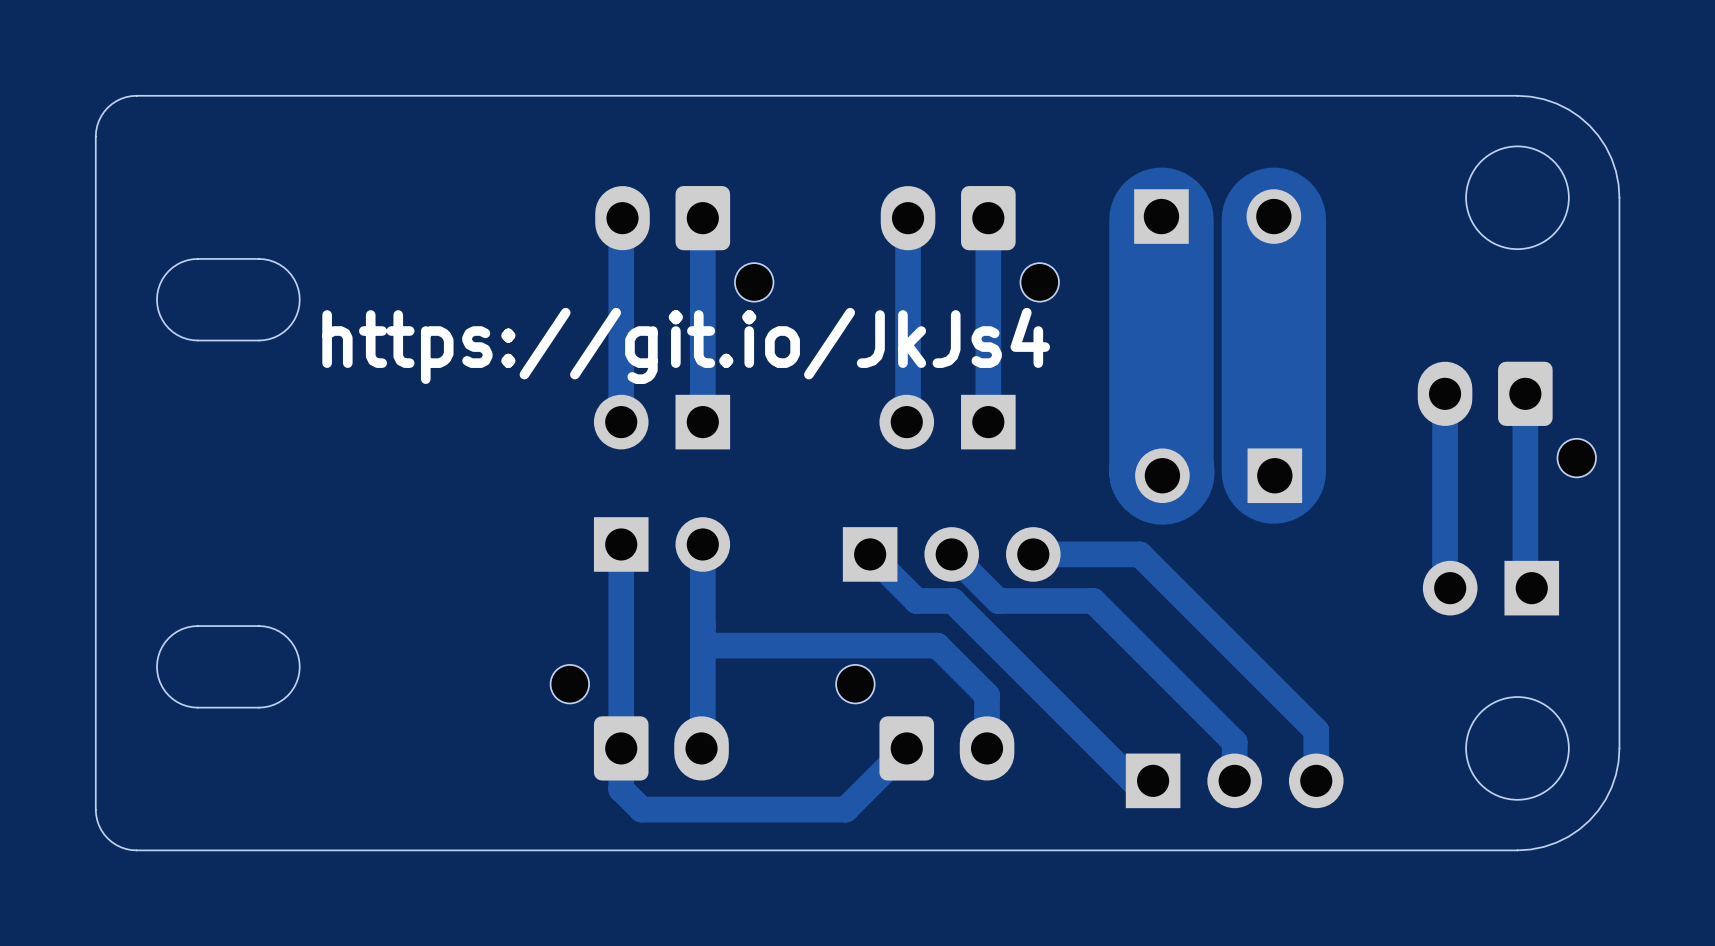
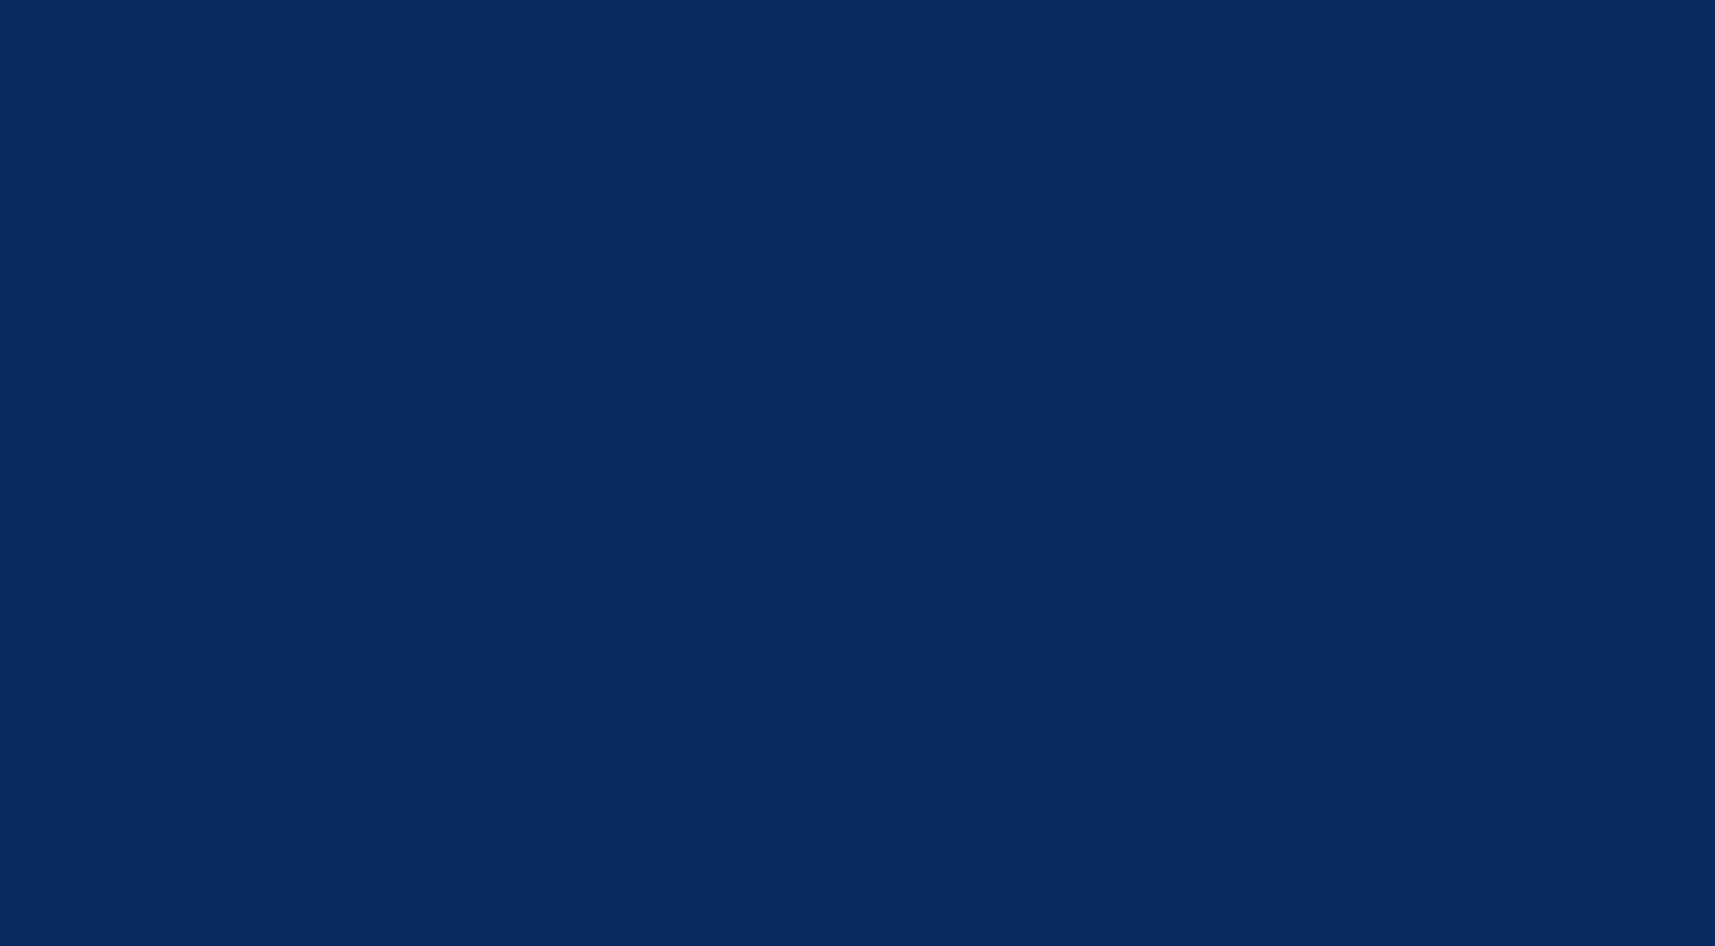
board edge: (1517, 95) (136, 95) (116, 101) (101, 116) (95, 136) (95, 809) (101, 830) (116, 844) (136, 850) (1517, 850) (1543, 846) (1568, 836) (1589, 820) (1598, 810) (1611, 787) (1618, 761) (1618, 184) (1615, 171) (1605, 146) (1598, 135) (1579, 116) (1556, 103) (1543, 99) (1517, 95) -> none
round board edge: [1465, 145, 1570, 250] -> none
part: (1217, 216) -> none
track: (622, 218) (621, 422) -> none
track: (702, 218) (702, 422) -> none
track: (908, 218) (906, 422) -> none
track: (988, 218) (988, 422) -> none
track: (1161, 219) (1162, 472) -> none
track: (1273, 219) (1274, 472) -> none
part: (684, 243) -> none
part: (969, 243) -> none
board edge: (258, 258) (192, 259) (177, 264) (165, 274) (158, 289) (157, 305) (162, 320) (172, 332) (192, 340) (258, 340) (279, 335) (287, 328) (296, 315) (299, 305) (298, 289) (291, 274) (283, 267) (274, 262) (258, 258) -> none
text: https://git.io/JkJs4 (686, 345) -> none
track: (1445, 393) (1445, 583) (1450, 588) -> none
track: (1525, 393) (1525, 581) (1531, 588) -> none
part: (1506, 419) -> none
part: (662, 422) -> none
part: (947, 422) -> none
part: (1218, 475) -> none
track: (621, 544) (621, 789) (641, 809) (845, 809) (906, 748) -> none
part: (662, 544) -> none
track: (702, 544) (701, 748) (701, 729) -> none
track: (870, 554) (916, 601) (952, 601) (1132, 780) (1153, 780) -> none
track: (951, 554) (998, 601) (1093, 601) (1234, 742) (1234, 780) -> none
part: (951, 554) -> none
track: (1033, 554) (1139, 554) (1316, 730) (1316, 780) -> none
part: (1490, 588) -> none
board edge: (258, 626) (192, 626) (177, 631) (165, 642) (158, 656) (157, 672) (162, 687) (177, 702) (192, 707) (258, 707) (279, 702) (287, 695) (296, 682) (299, 672) (298, 656) (291, 642) (283, 634) (274, 629) (258, 626) -> none
track: (702, 647) (705, 645) (937, 645) (987, 695) (987, 748) -> none
round board edge: [1465, 696, 1570, 801] -> none
part: (639, 722) -> none
part: (925, 722) -> none
part: (1234, 780) -> none

